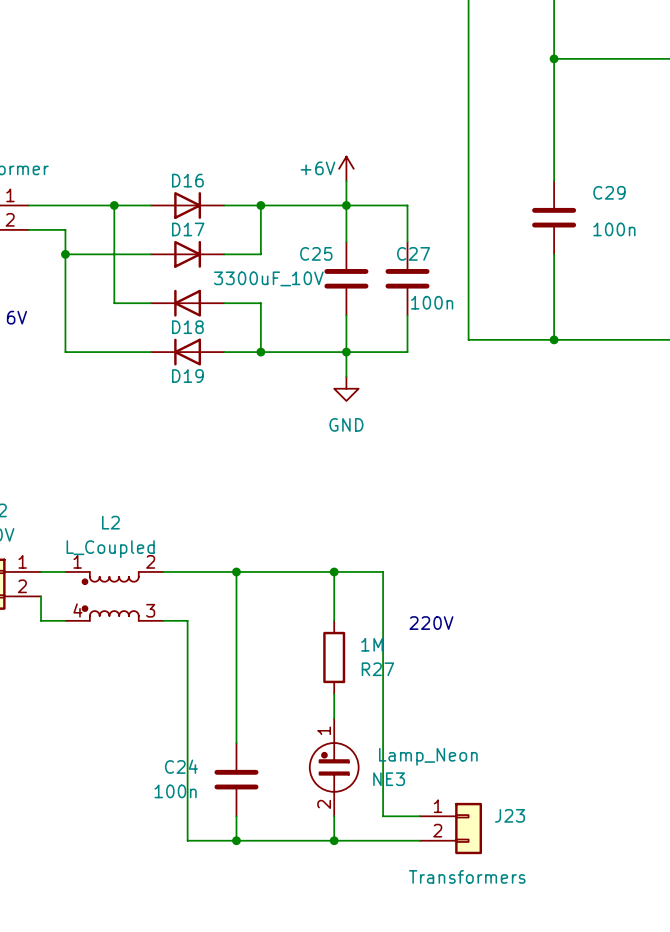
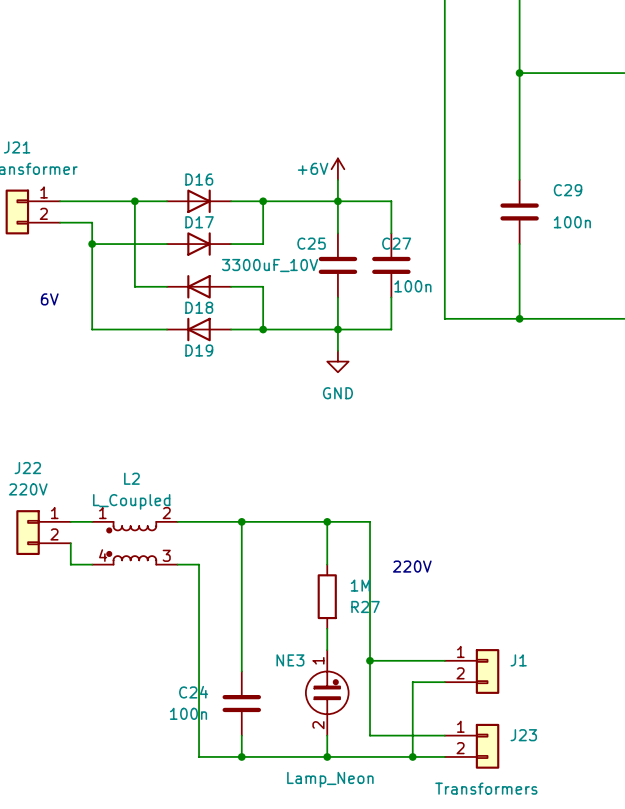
wire: none -> (370, 660) (444, 660)
junction: none -> (370, 660)
J1: none -> (472, 671)
wire: none -> (444, 682) (412, 682) (412, 756)
NE3 value position: Lamp_Neon (428, 756) -> Lamp_Neon (330, 779)
NE3 flip: as is (334, 767) -> left-right (327, 692)
NE3 name position: NE3 (389, 779) -> NE3 (290, 660)
J23 position: (450, 828) -> (472, 746)
junction: none -> (412, 756)

